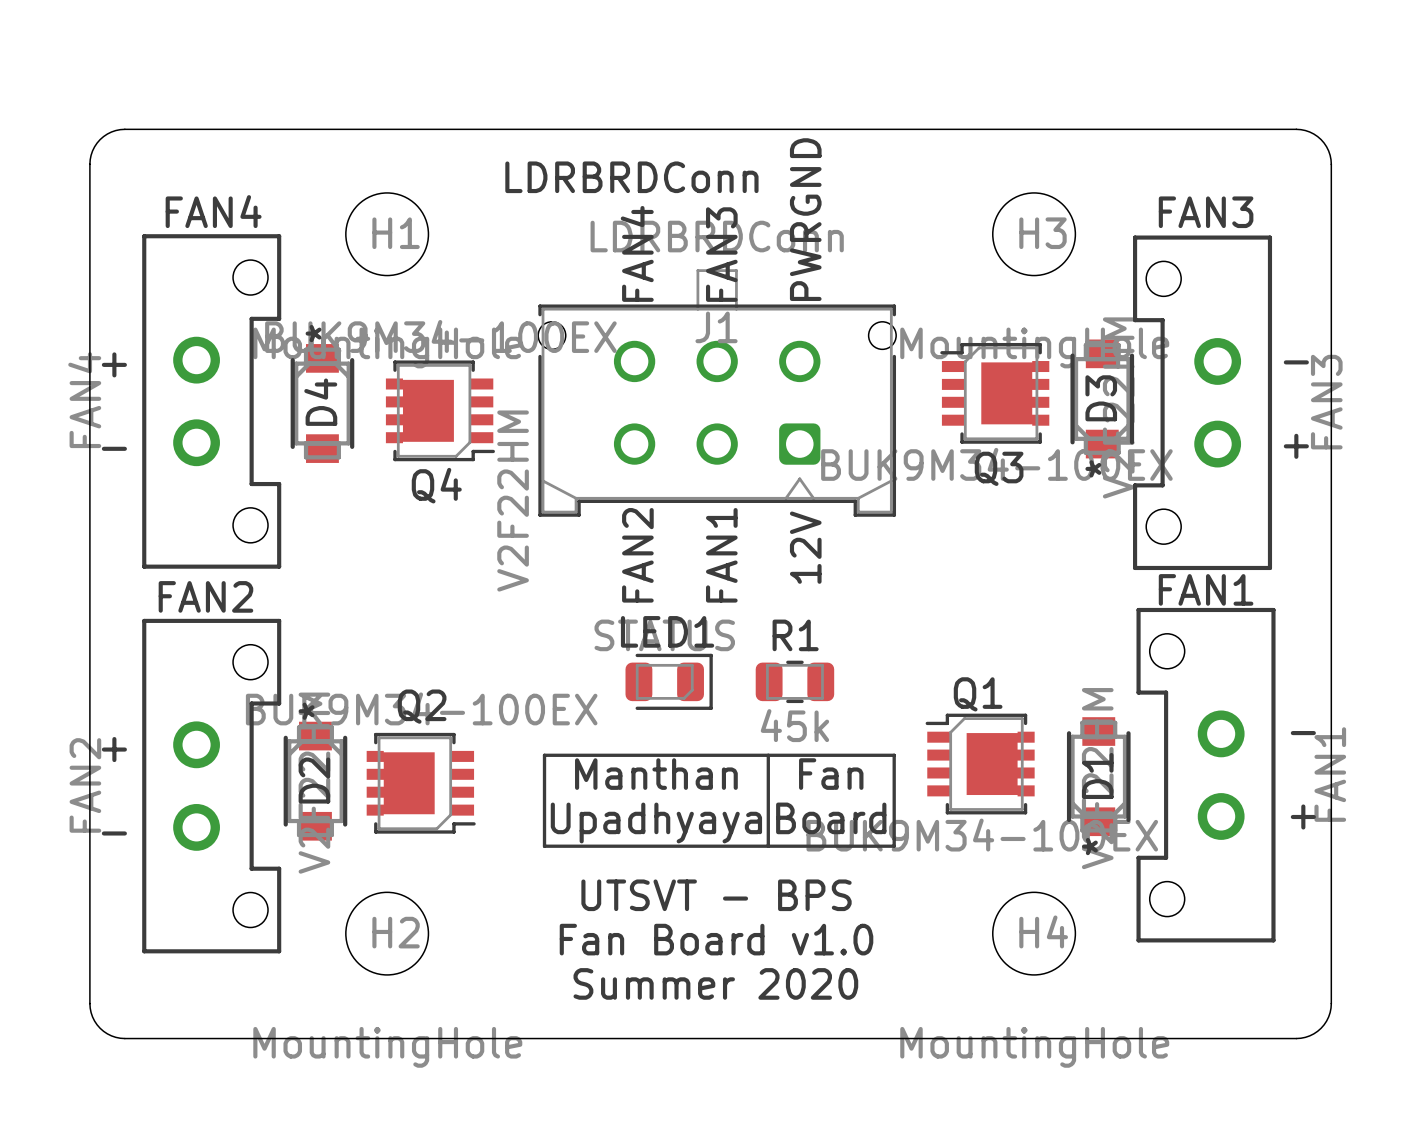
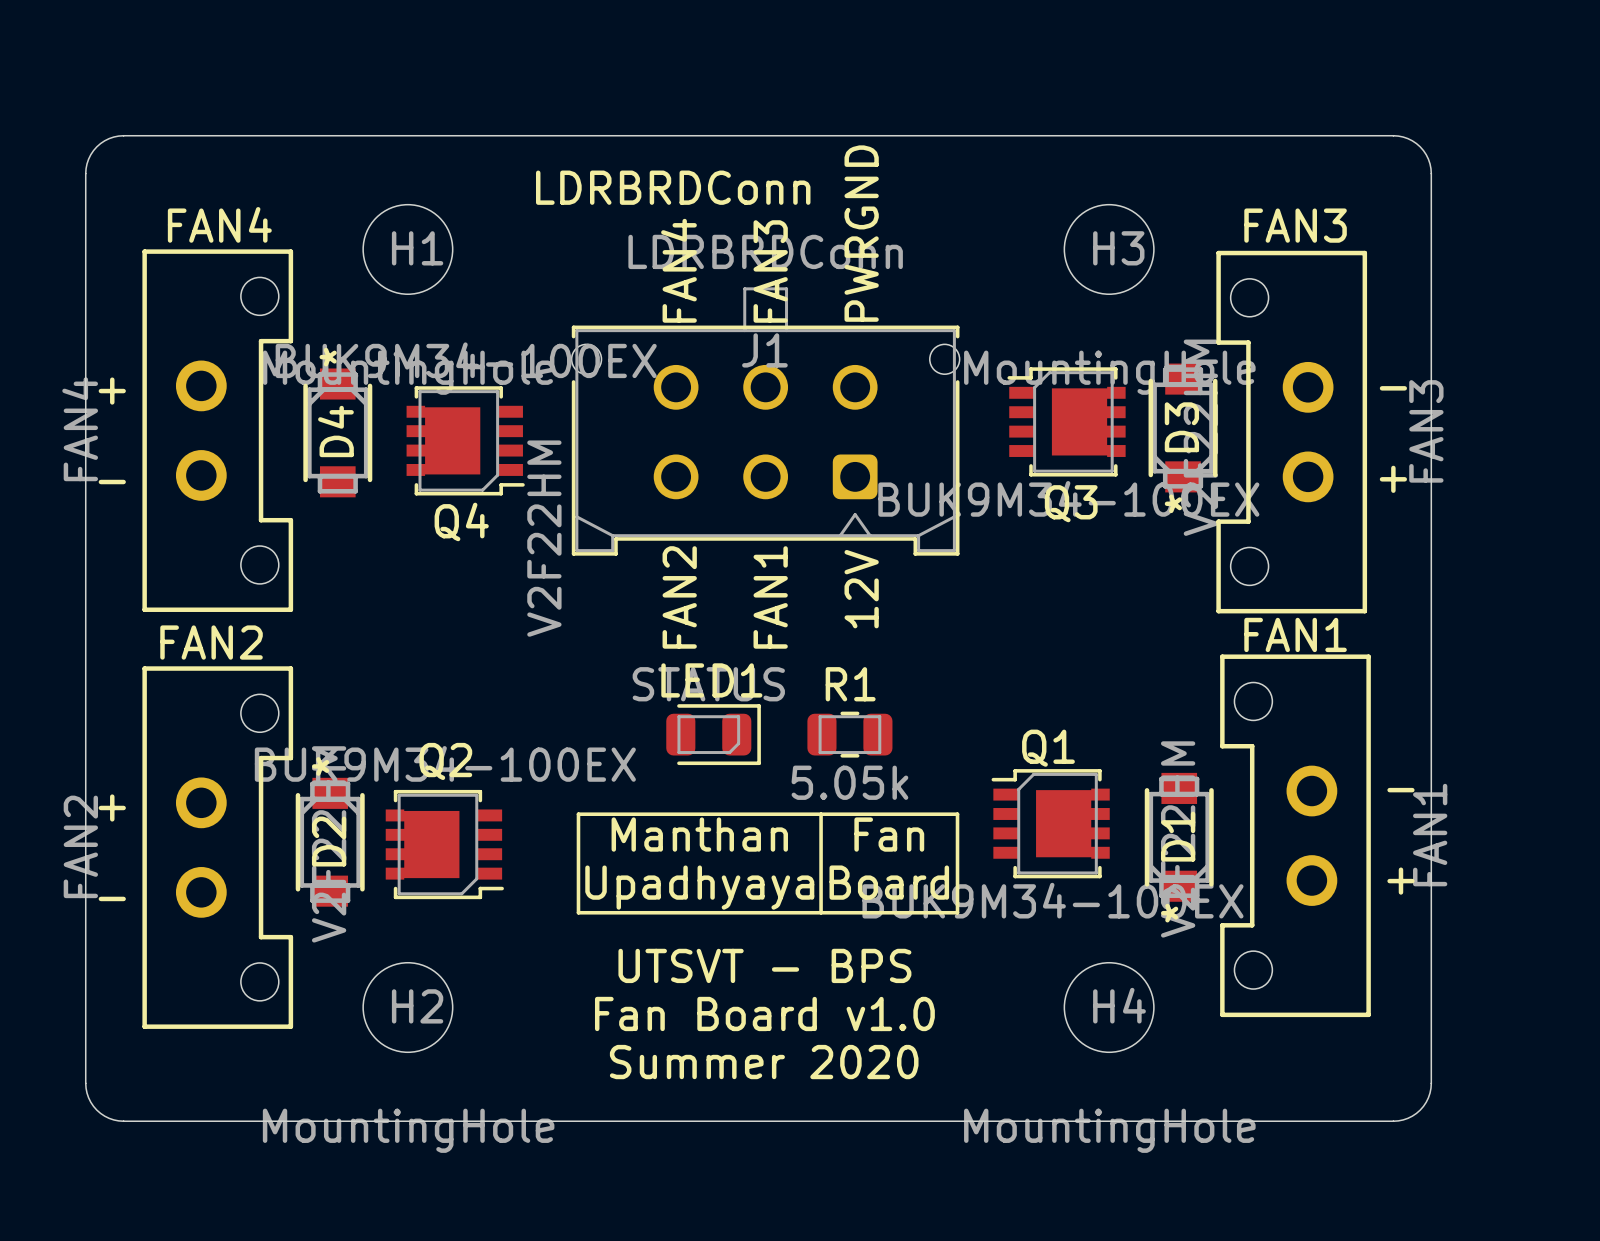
R1 value: 45k (794, 725) -> 5.05k (849, 782)

